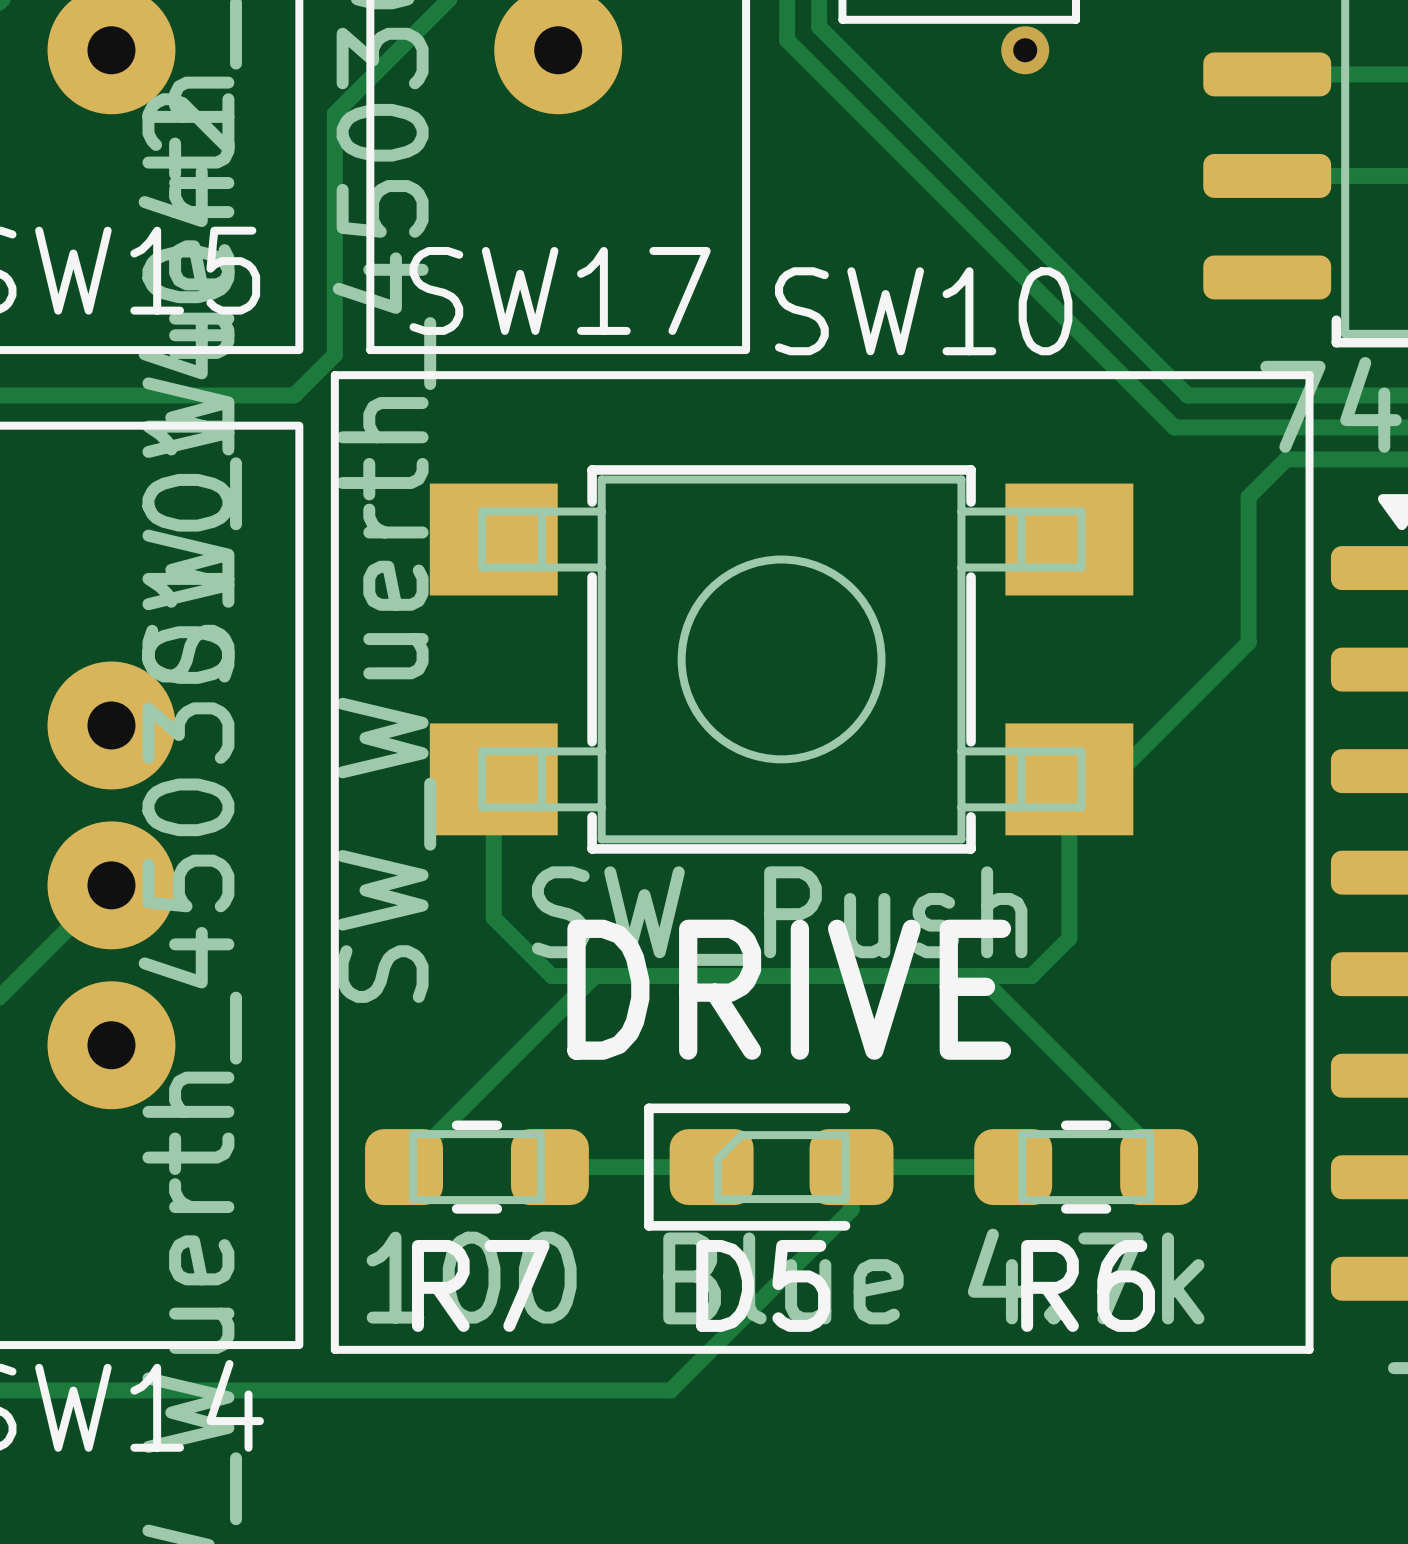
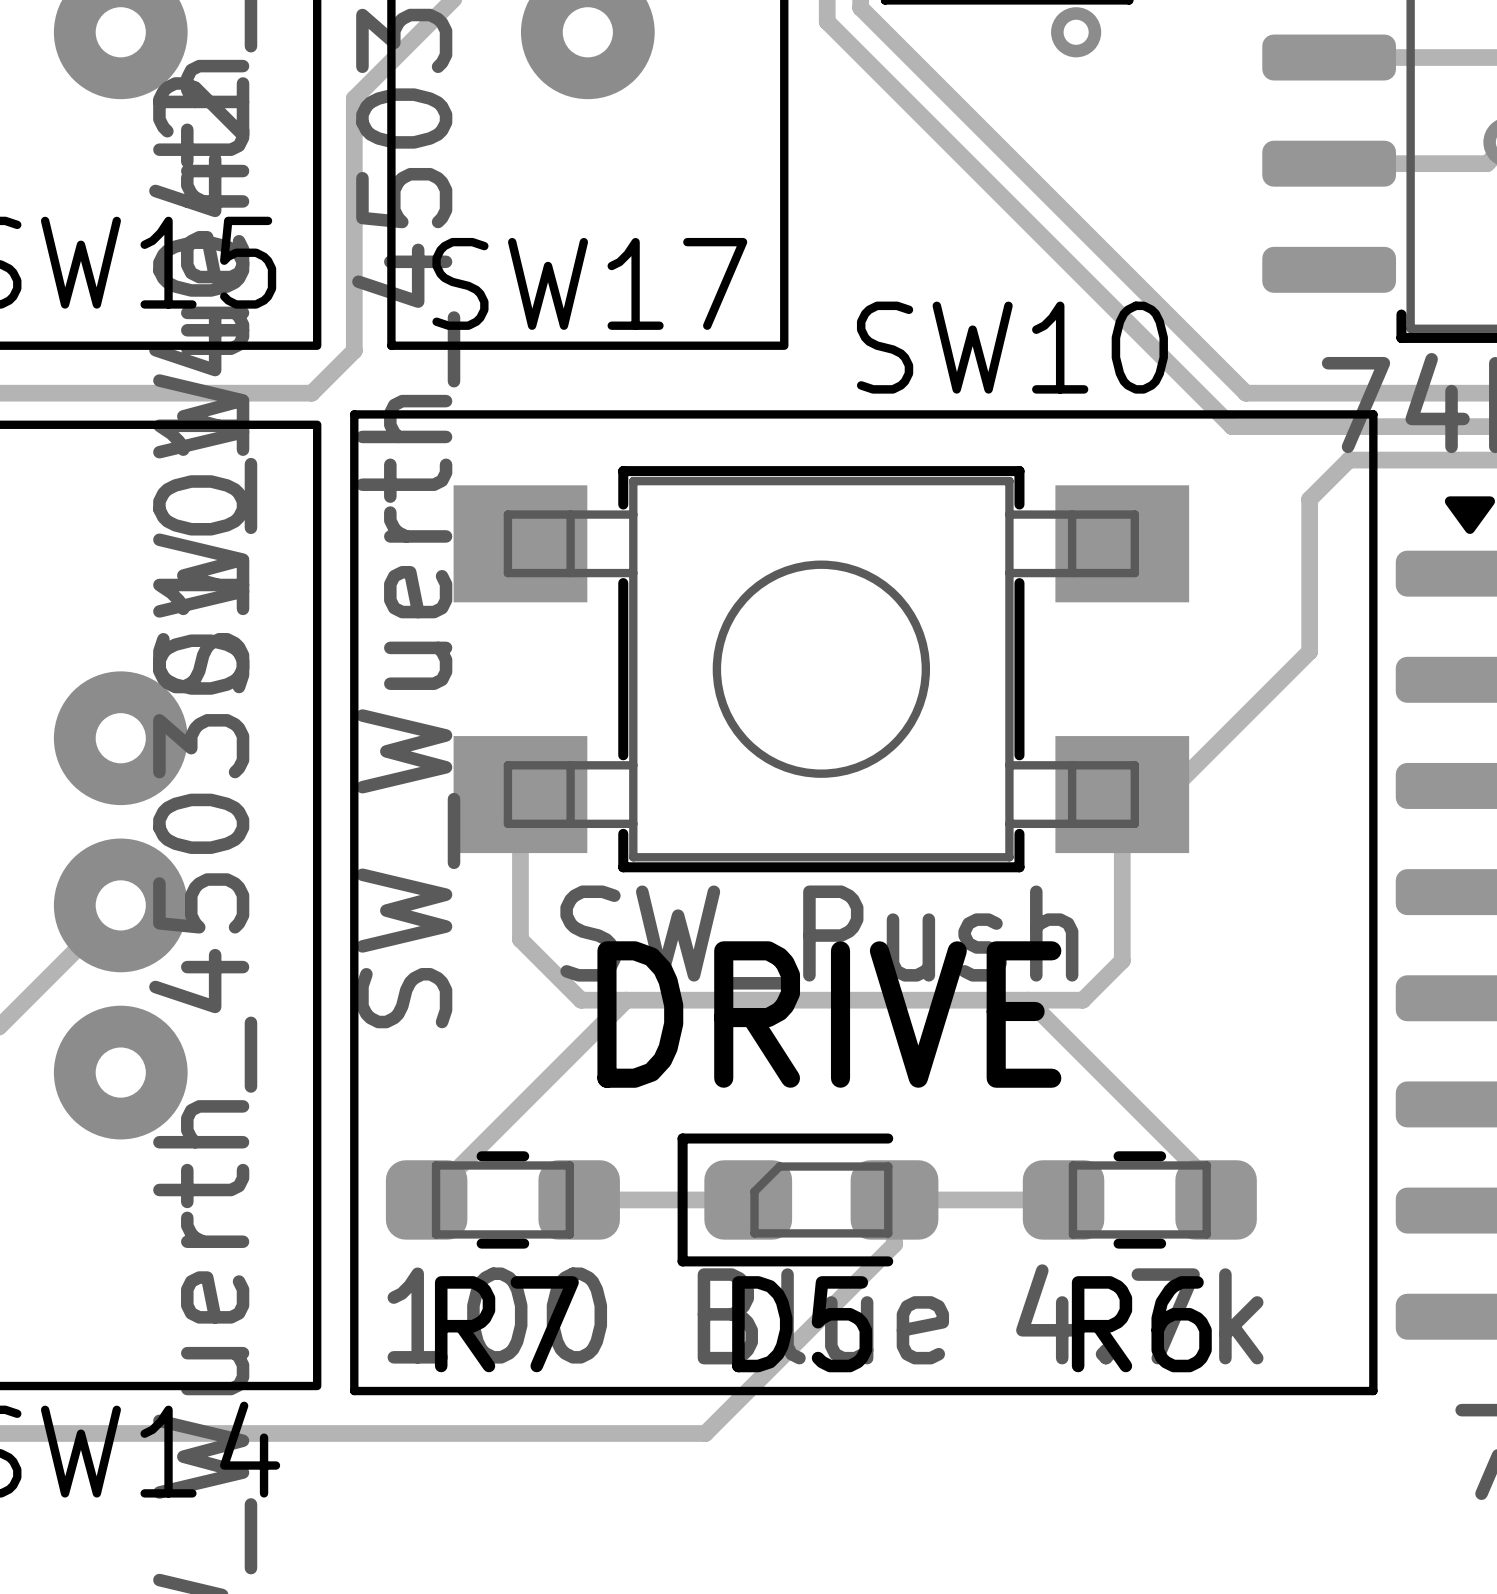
SW10 name position: SW10 (923, 311) -> SW10 (1012, 347)
line: (334, 415) (334, 375) (1309, 375) (1309, 415) -> (354, 414) (1373, 414)

